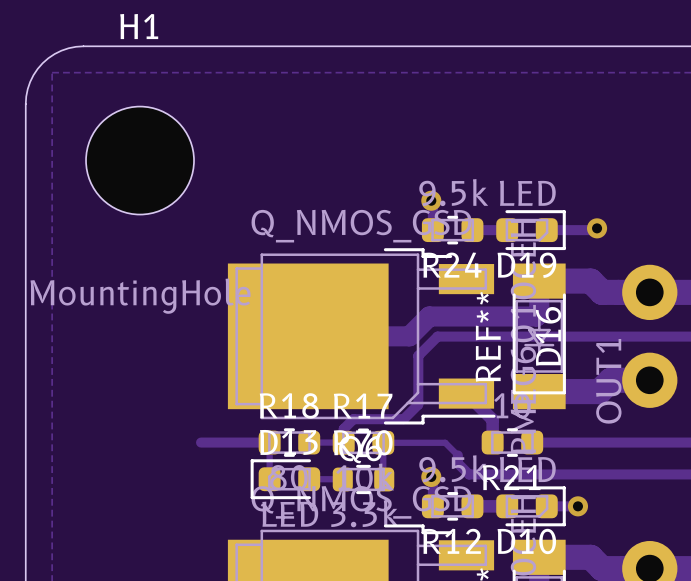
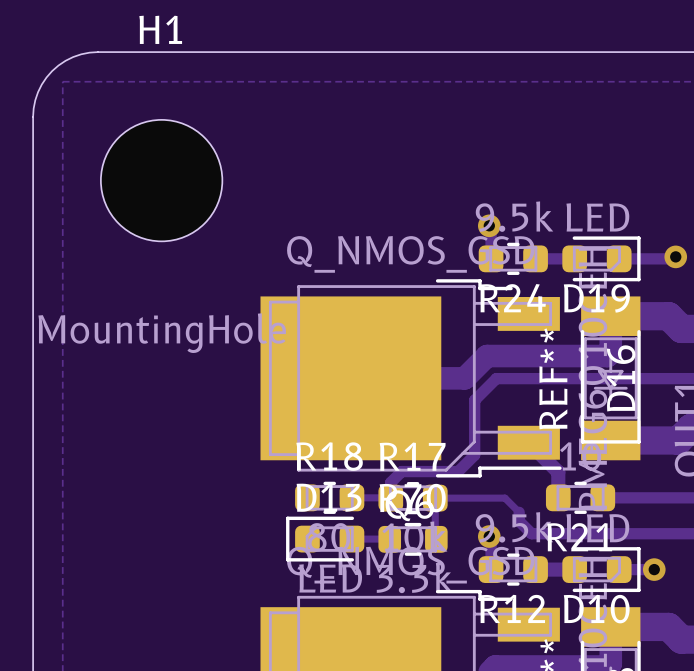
track: (201, 442) (269, 442) (269, 479) -> none

